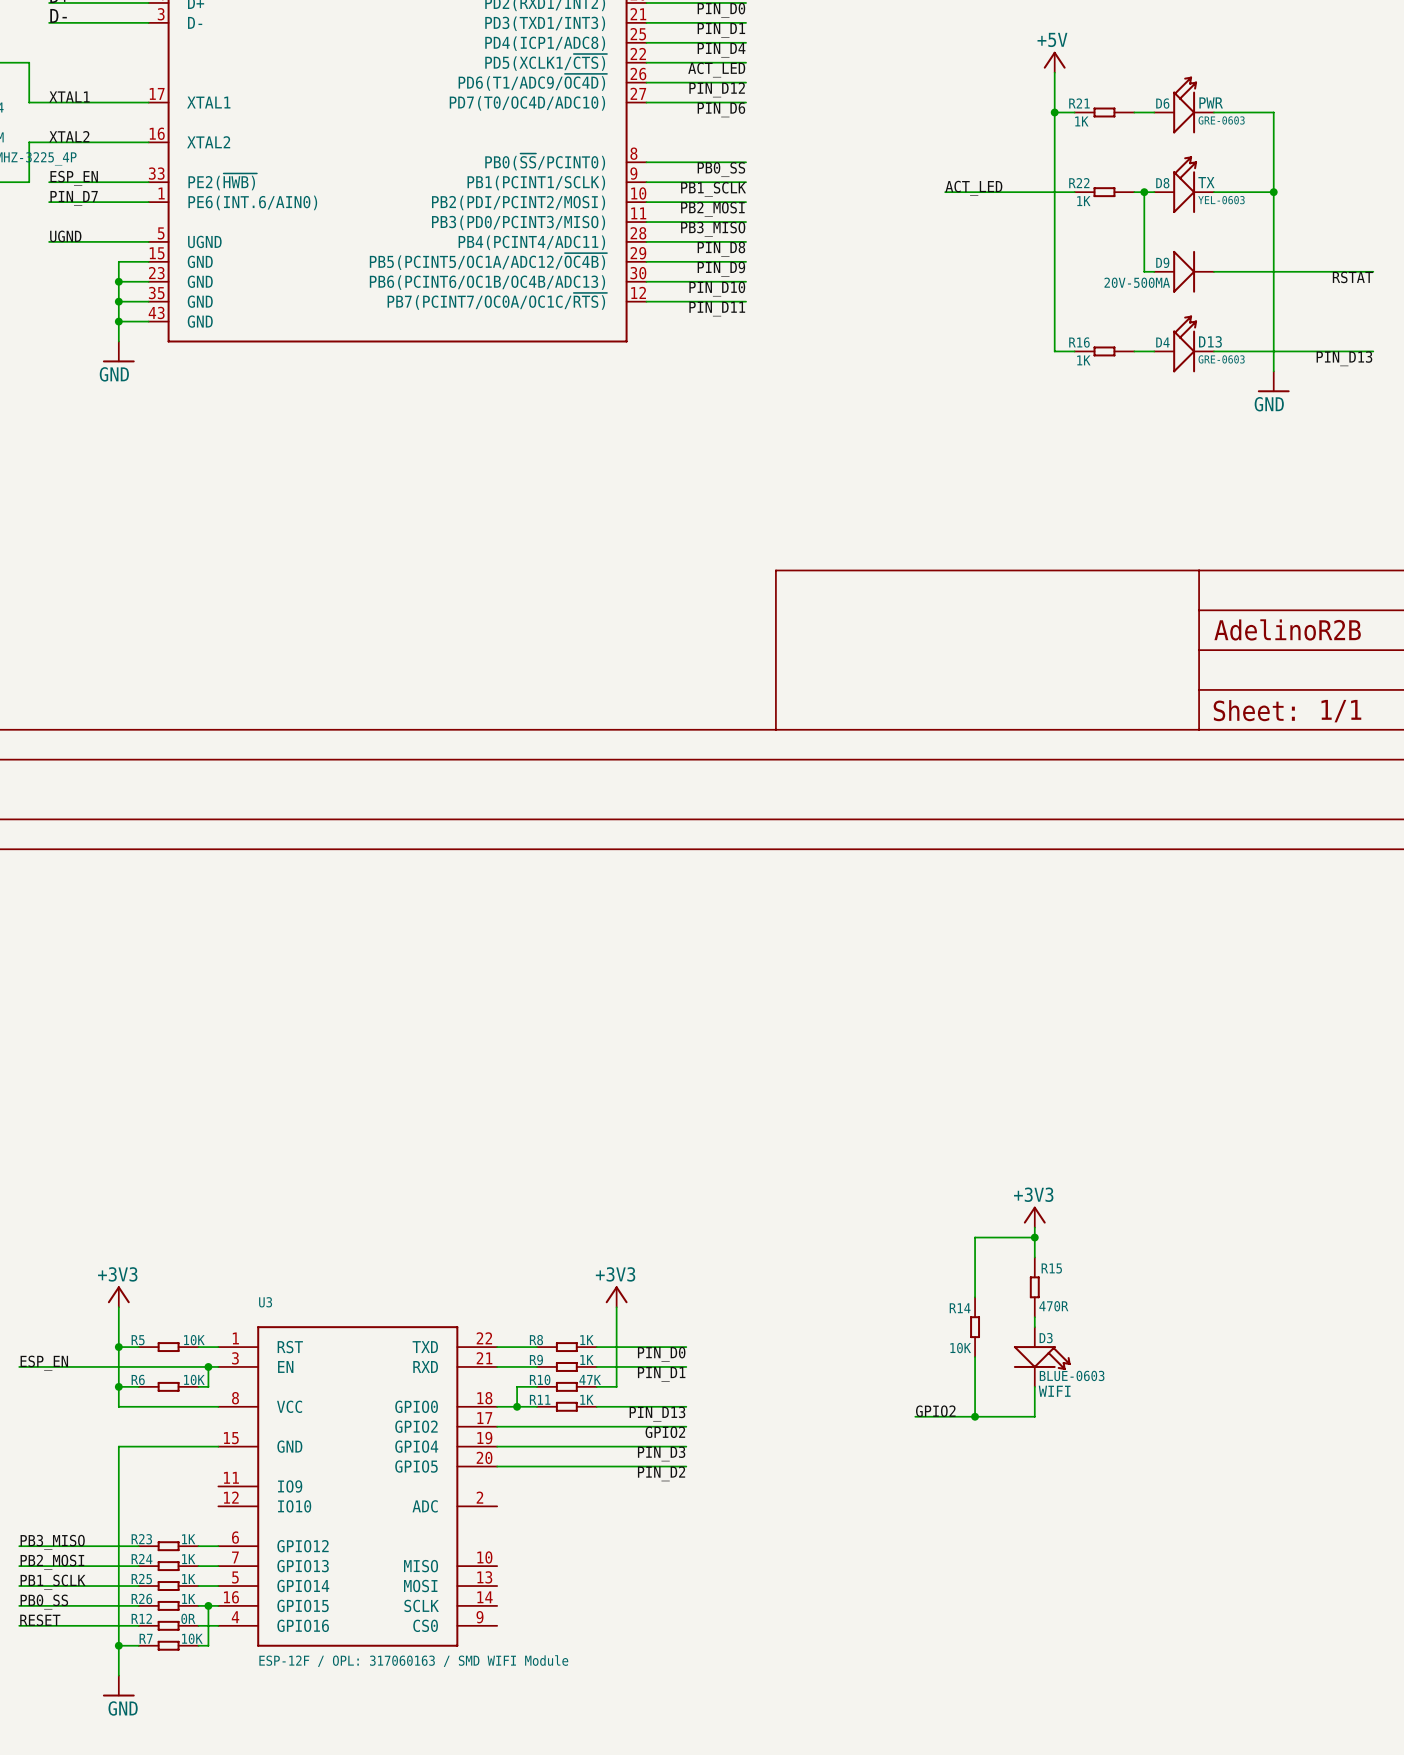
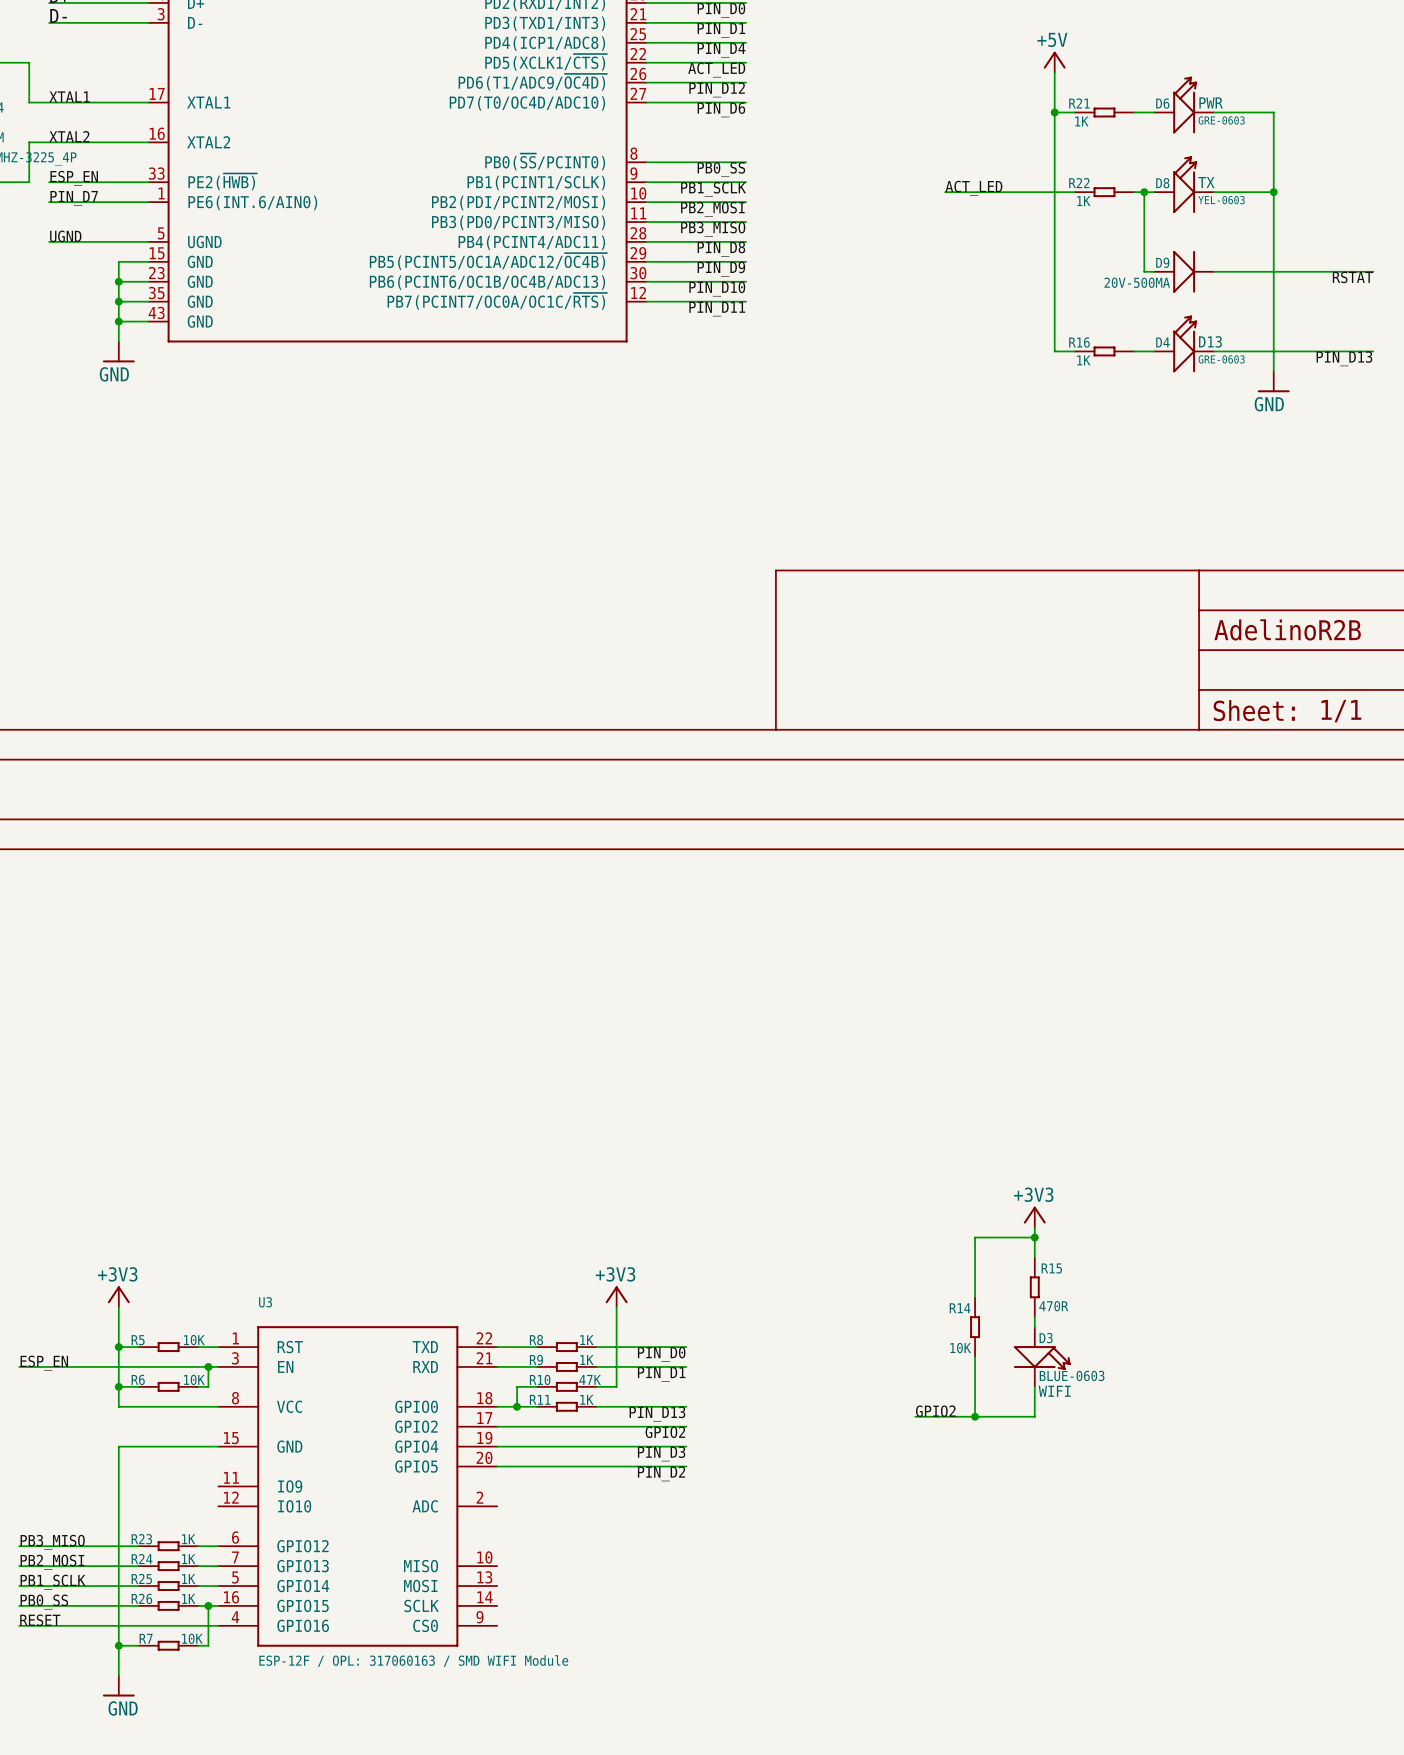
R12: 0R (168, 1625) -> none

